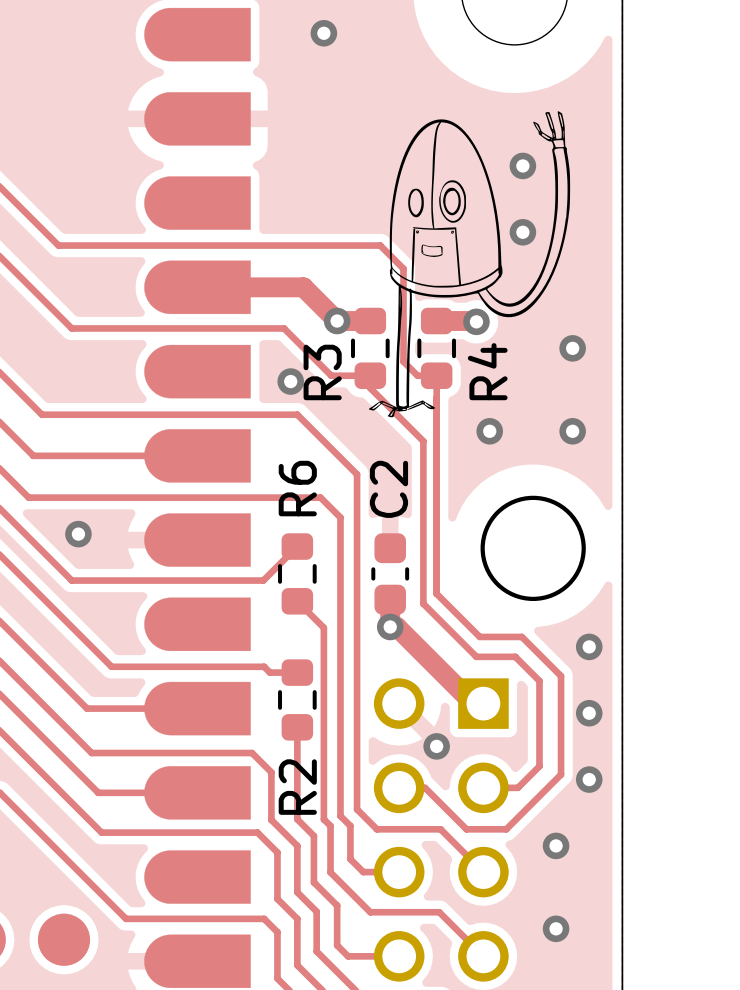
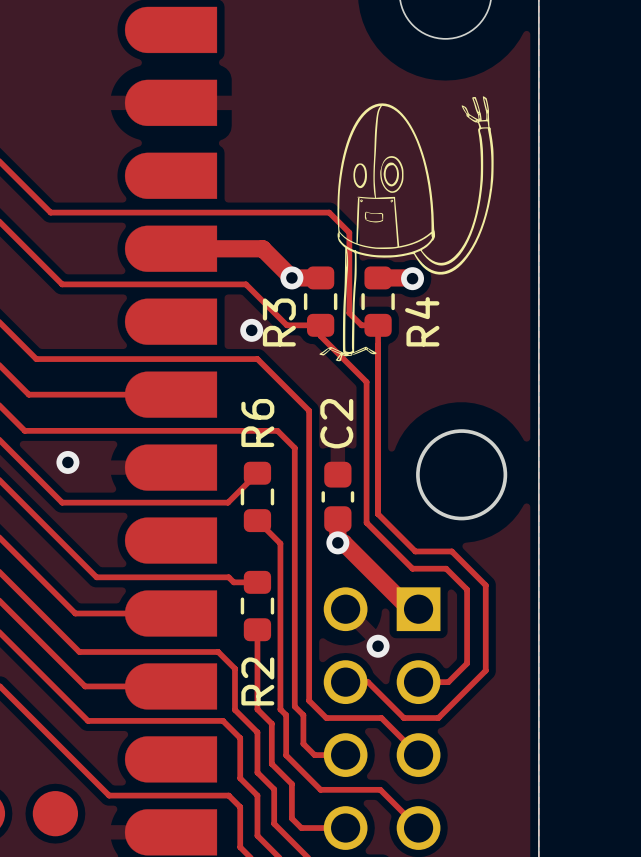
via: (323, 33) -> none
via: (522, 165) -> none
via: (522, 232) -> none
via: (572, 348) -> none
via: (489, 431) -> none
via: (572, 431) -> none
via: (589, 646) -> none
via: (589, 713) -> none
via: (589, 779) -> none
via: (556, 845) -> none
via: (556, 928) -> none

